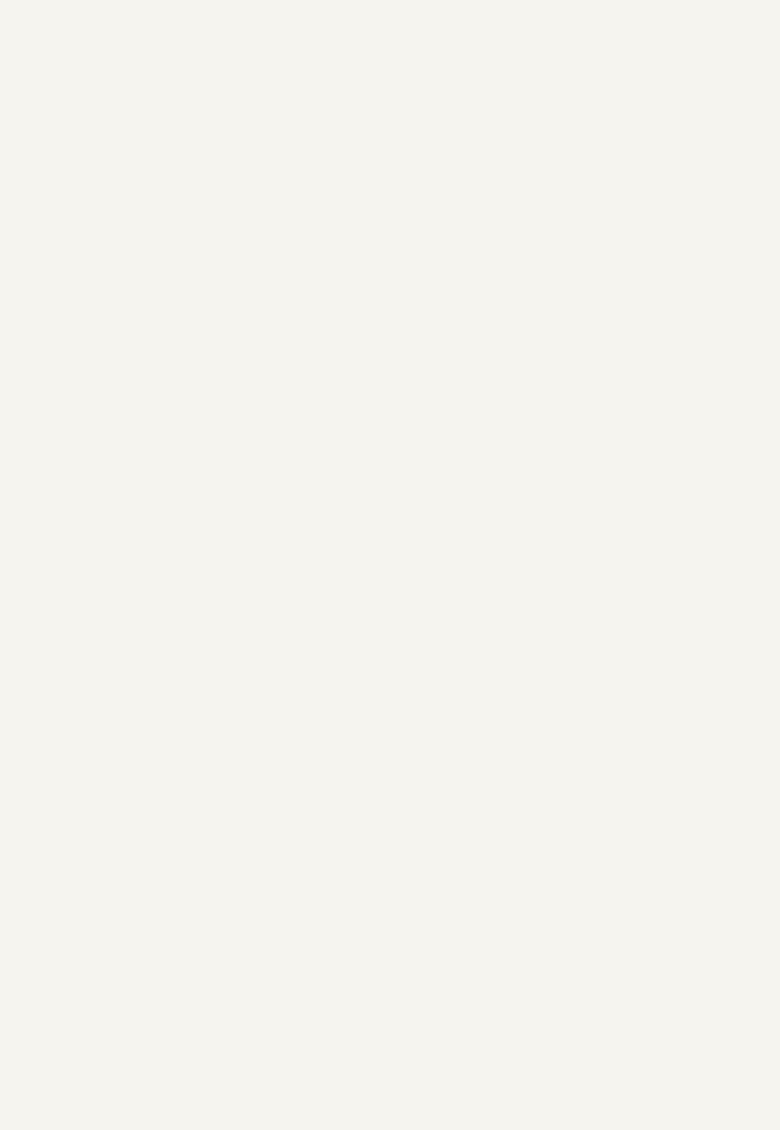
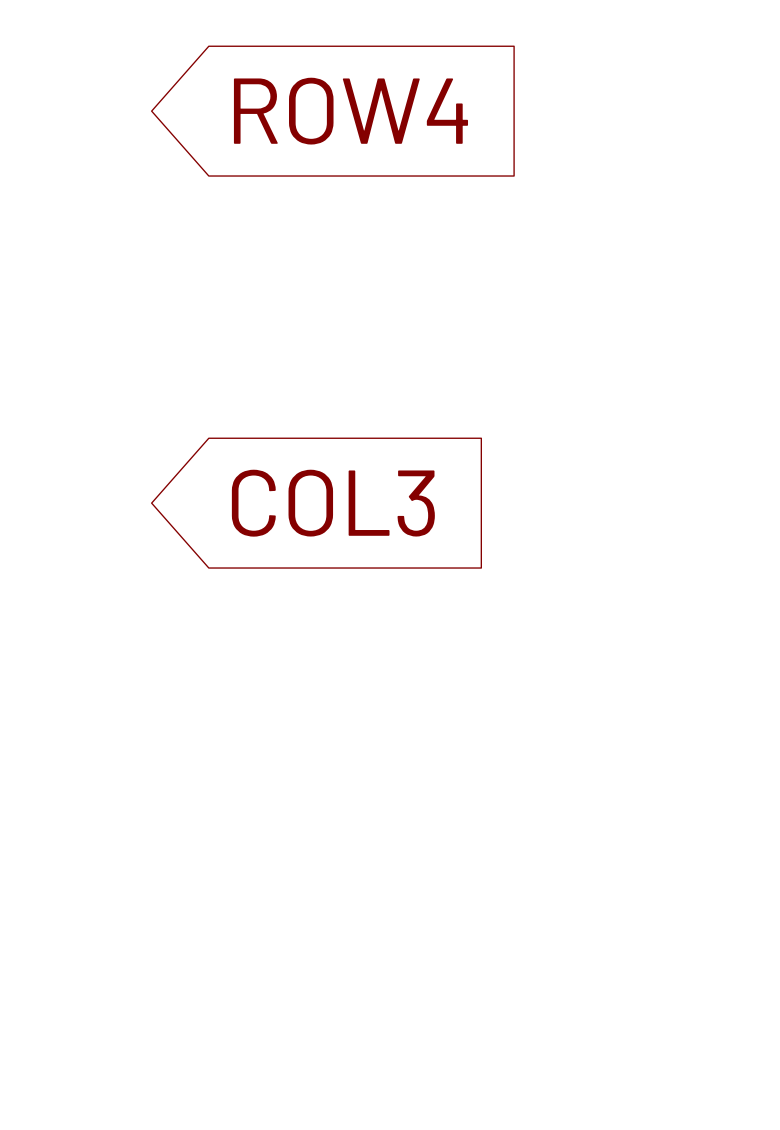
global label: none -> ROW4 (350, 111)
global label: none -> COL3 (333, 503)

